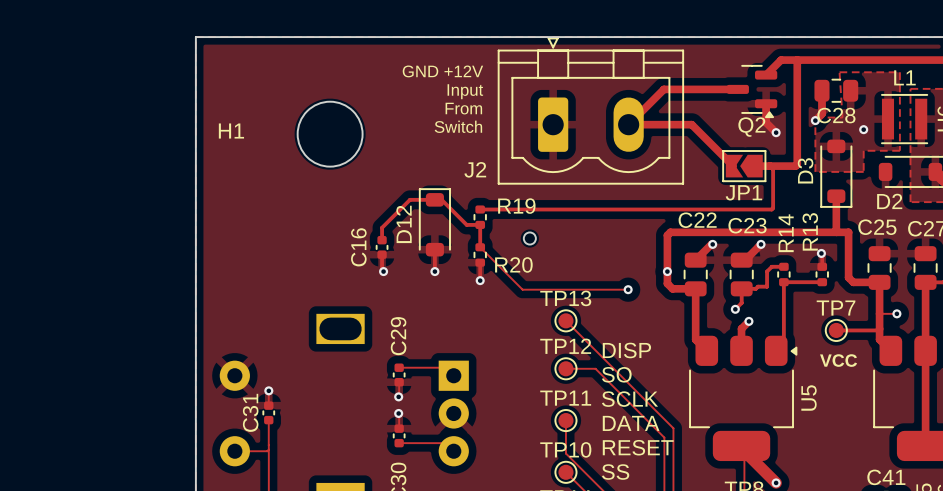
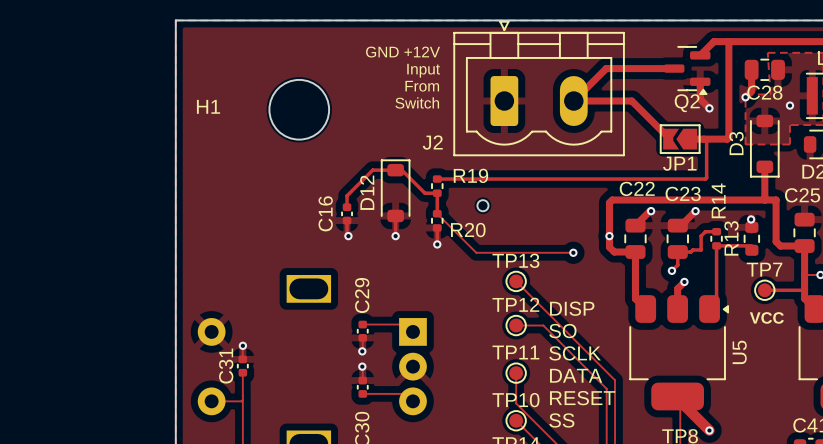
R13 name position: R13 (810, 231) -> R13 (731, 238)
R13 footprint: [815, 262, 829, 287] -> [743, 221, 760, 256]

